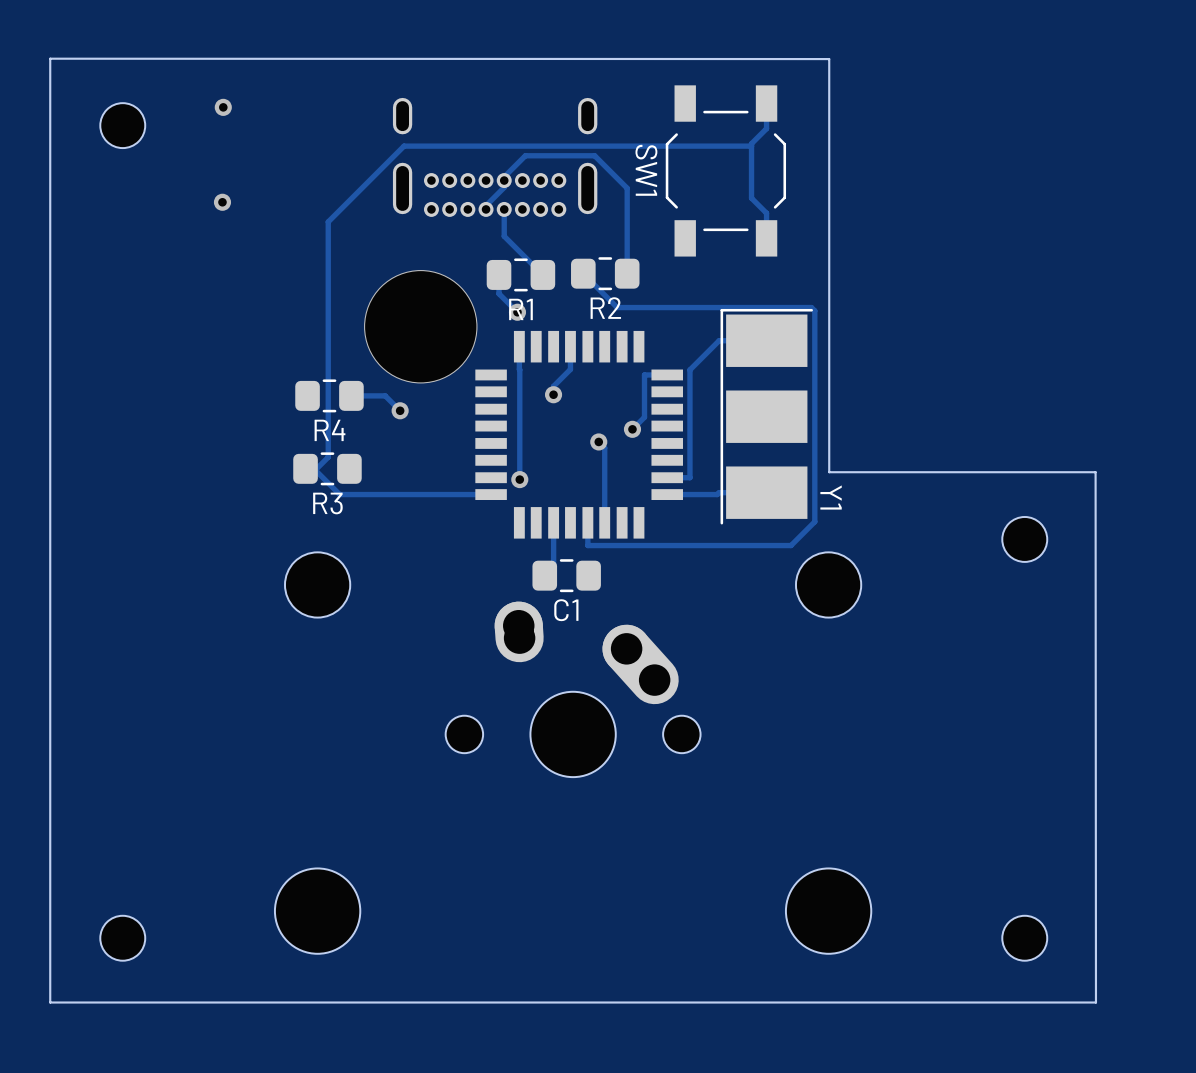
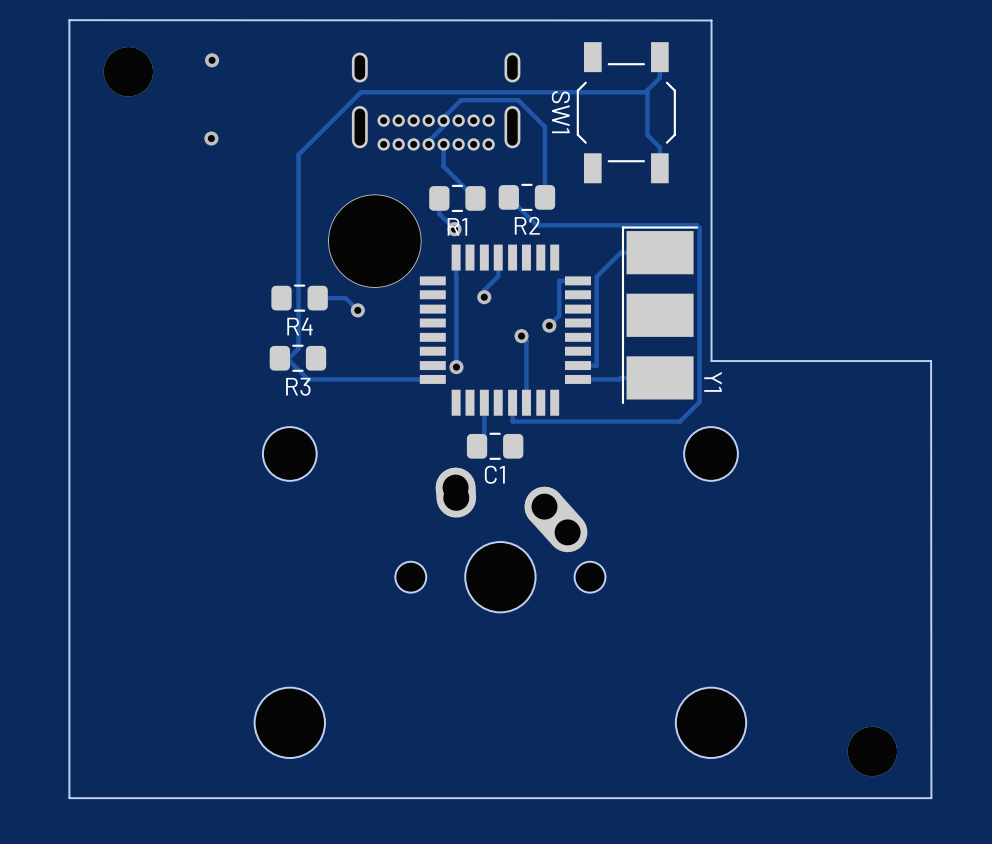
part footprint: [100, 103, 146, 149] -> [103, 47, 154, 97]
part: (1024, 539) -> none
part footprint: [1002, 915, 1048, 961] -> [847, 726, 898, 777]
part: (122, 938) -> none

